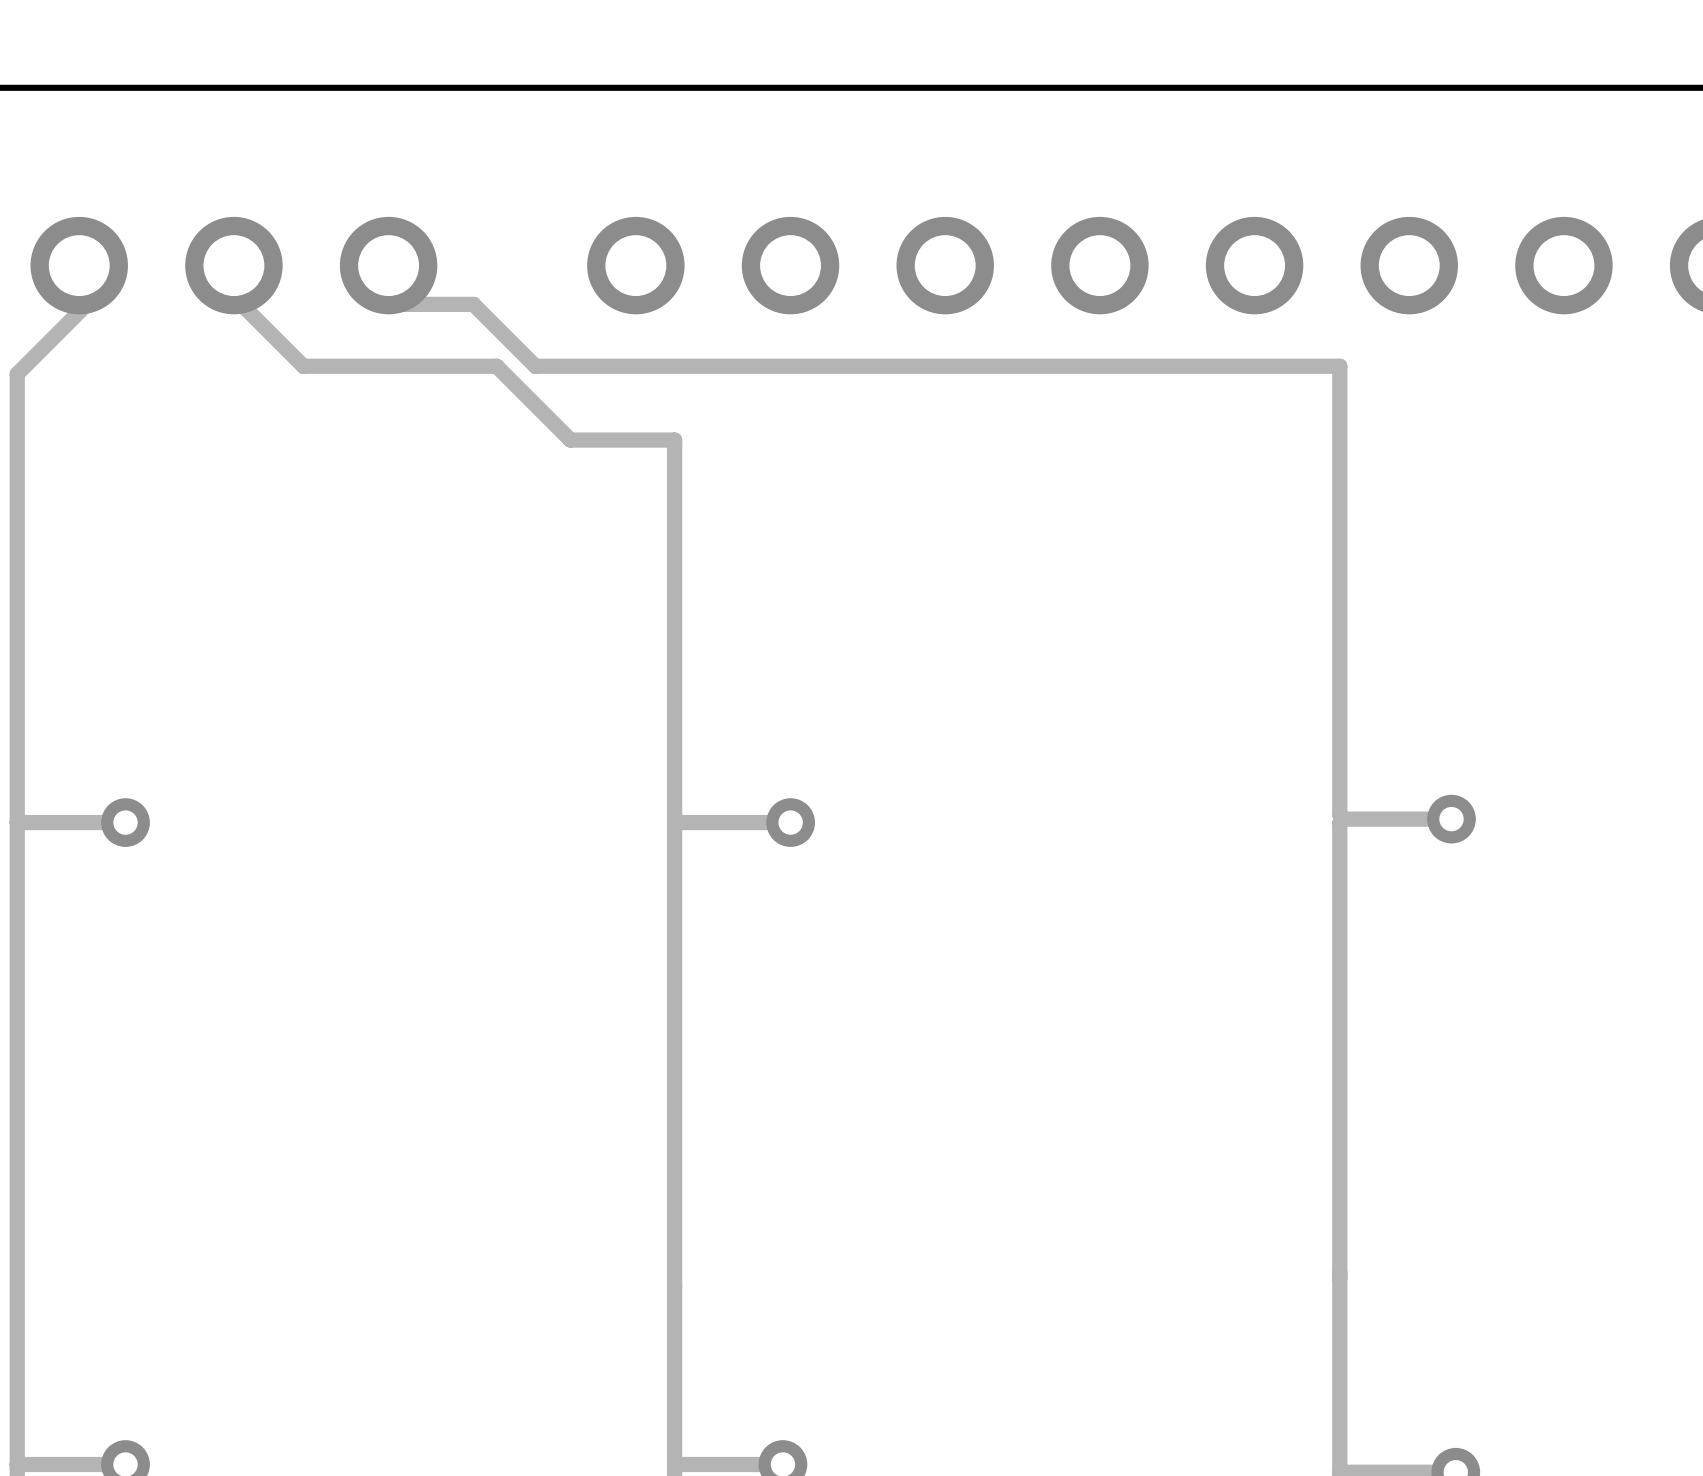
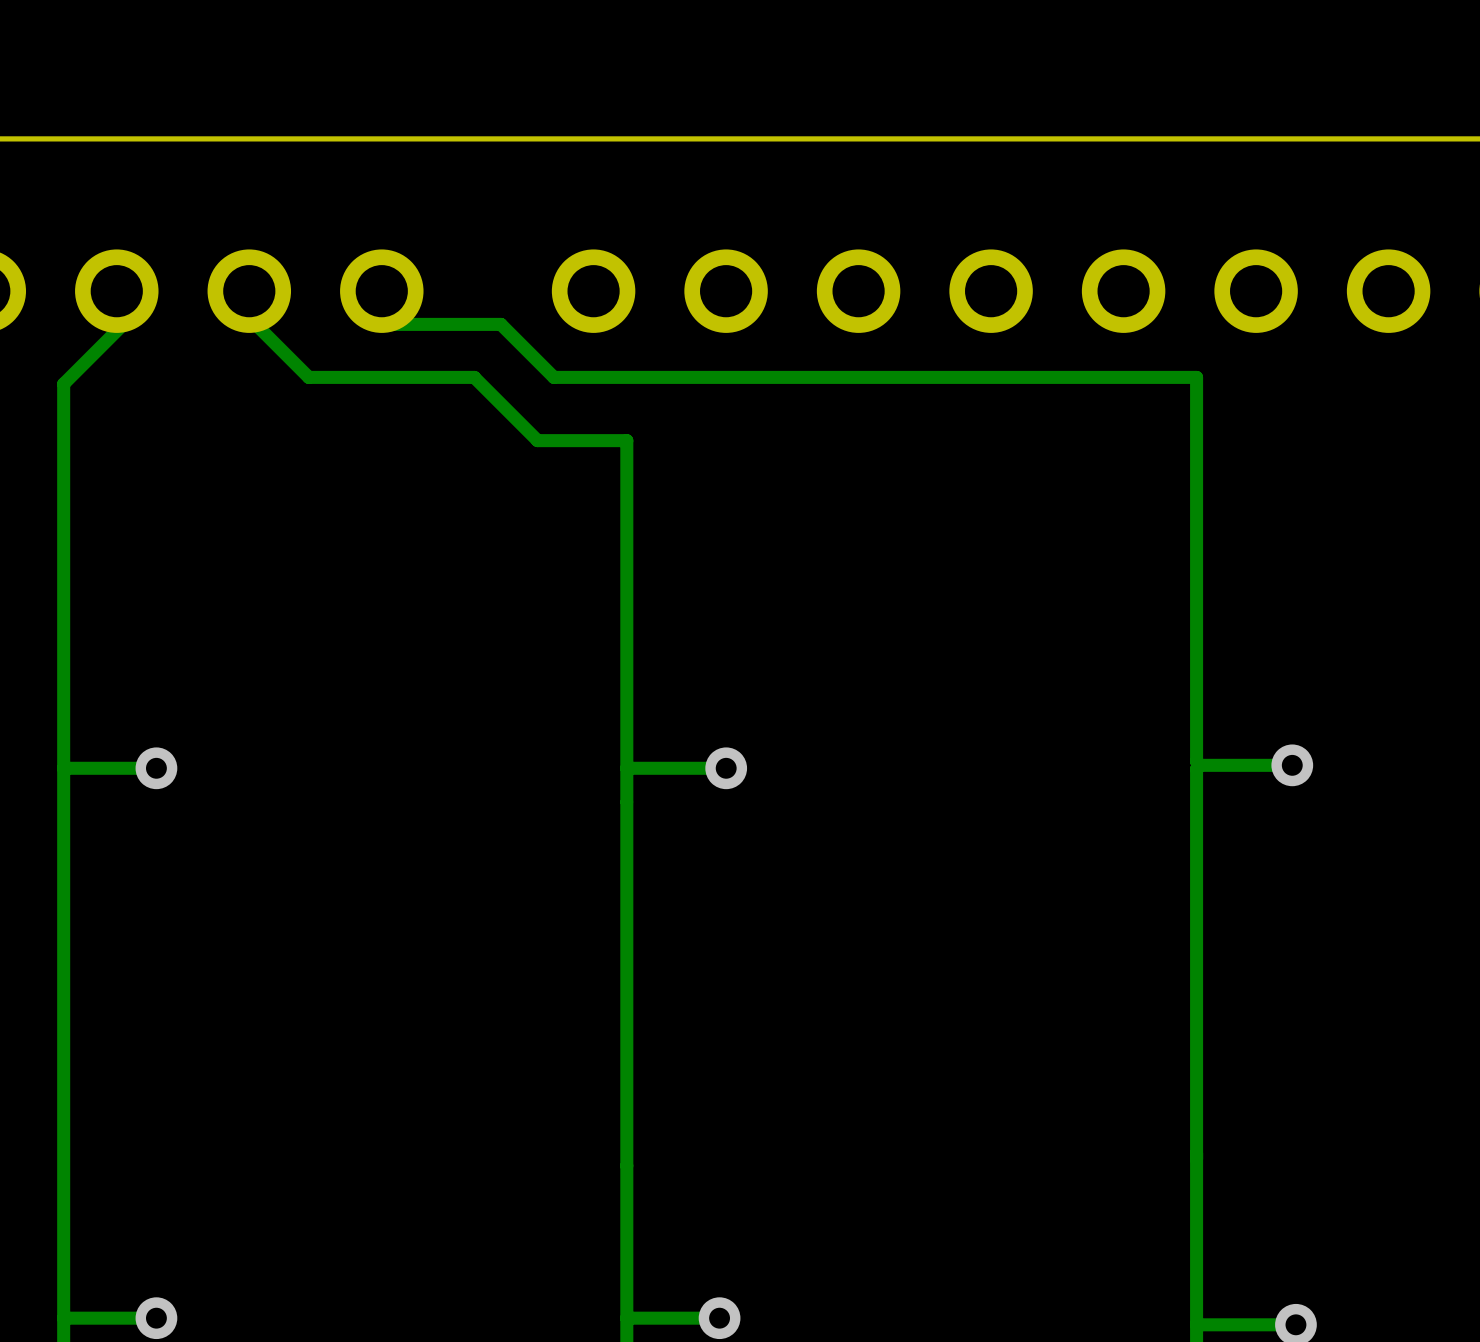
track: (473, 304) (535, 366) (589, 366) -> (454, 324) (500, 324) (553, 377)

